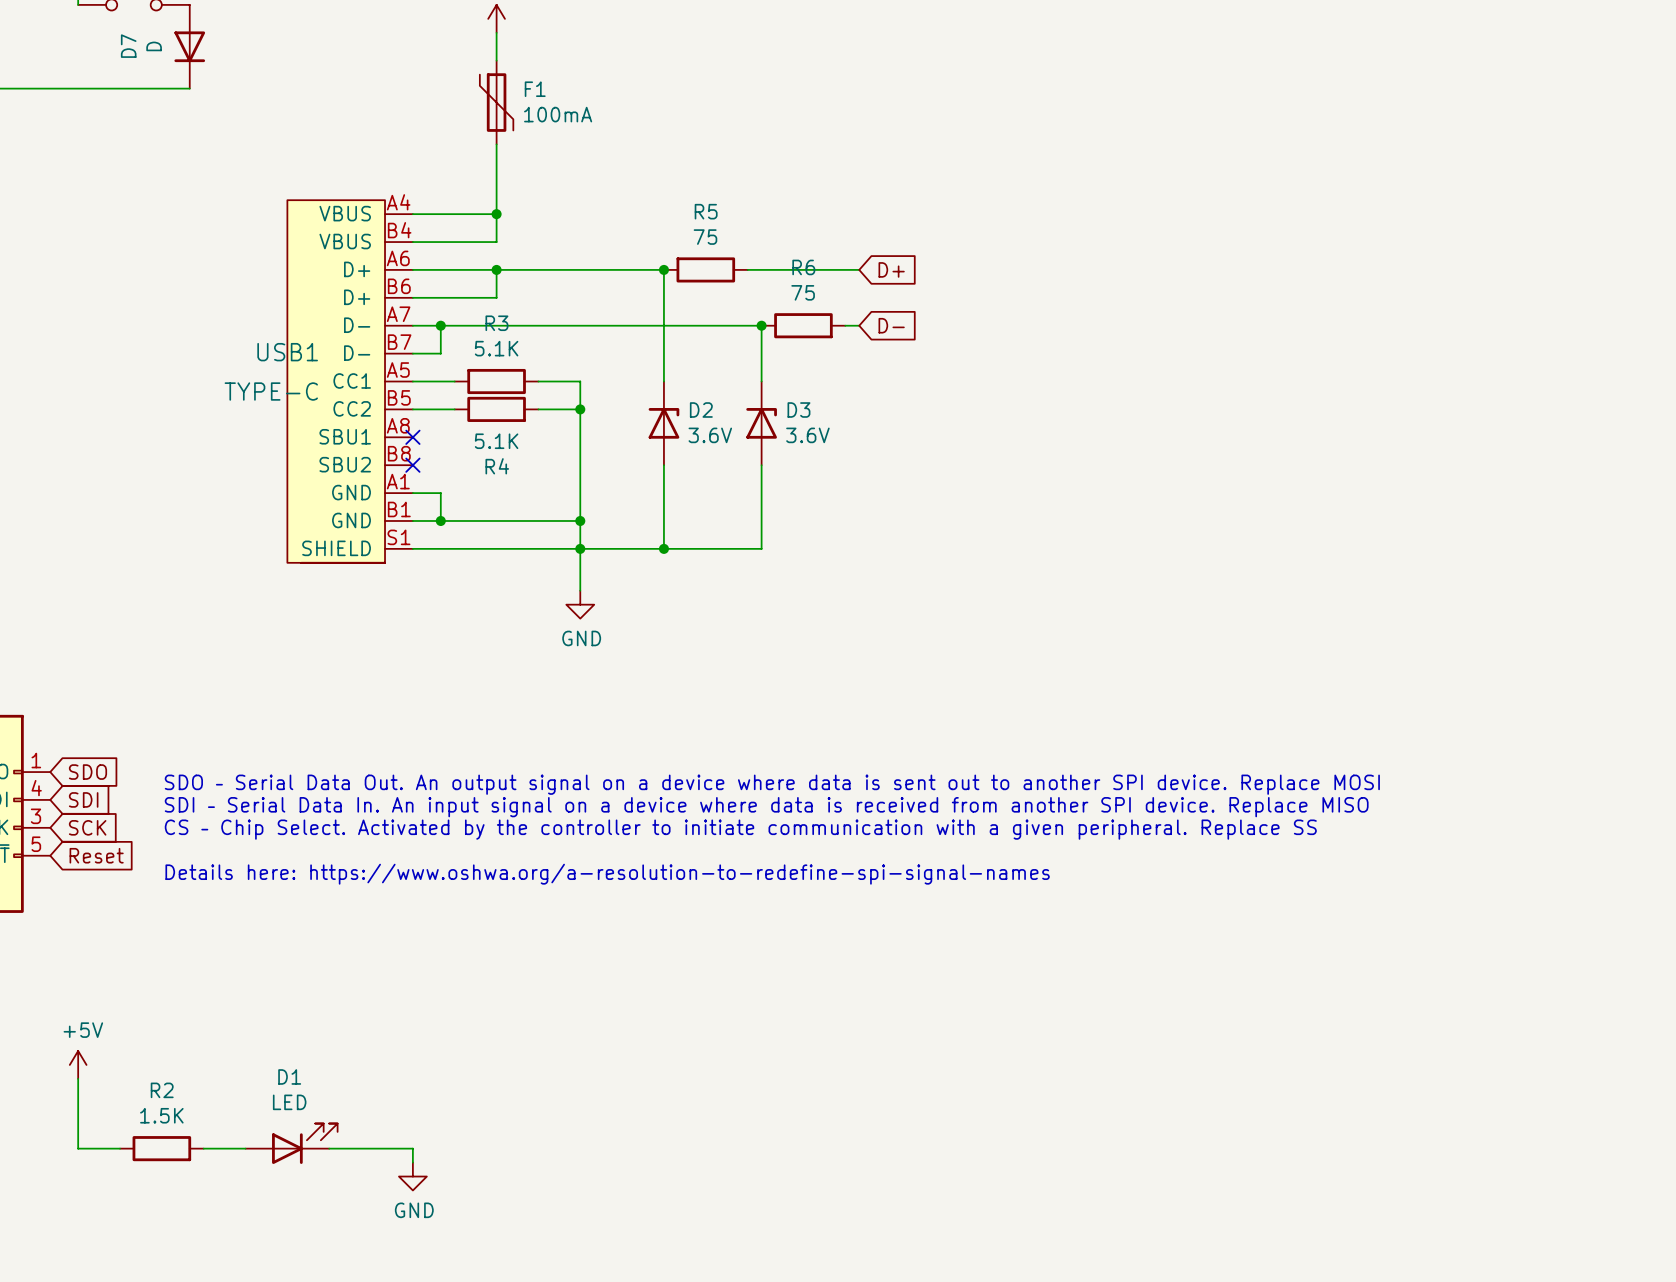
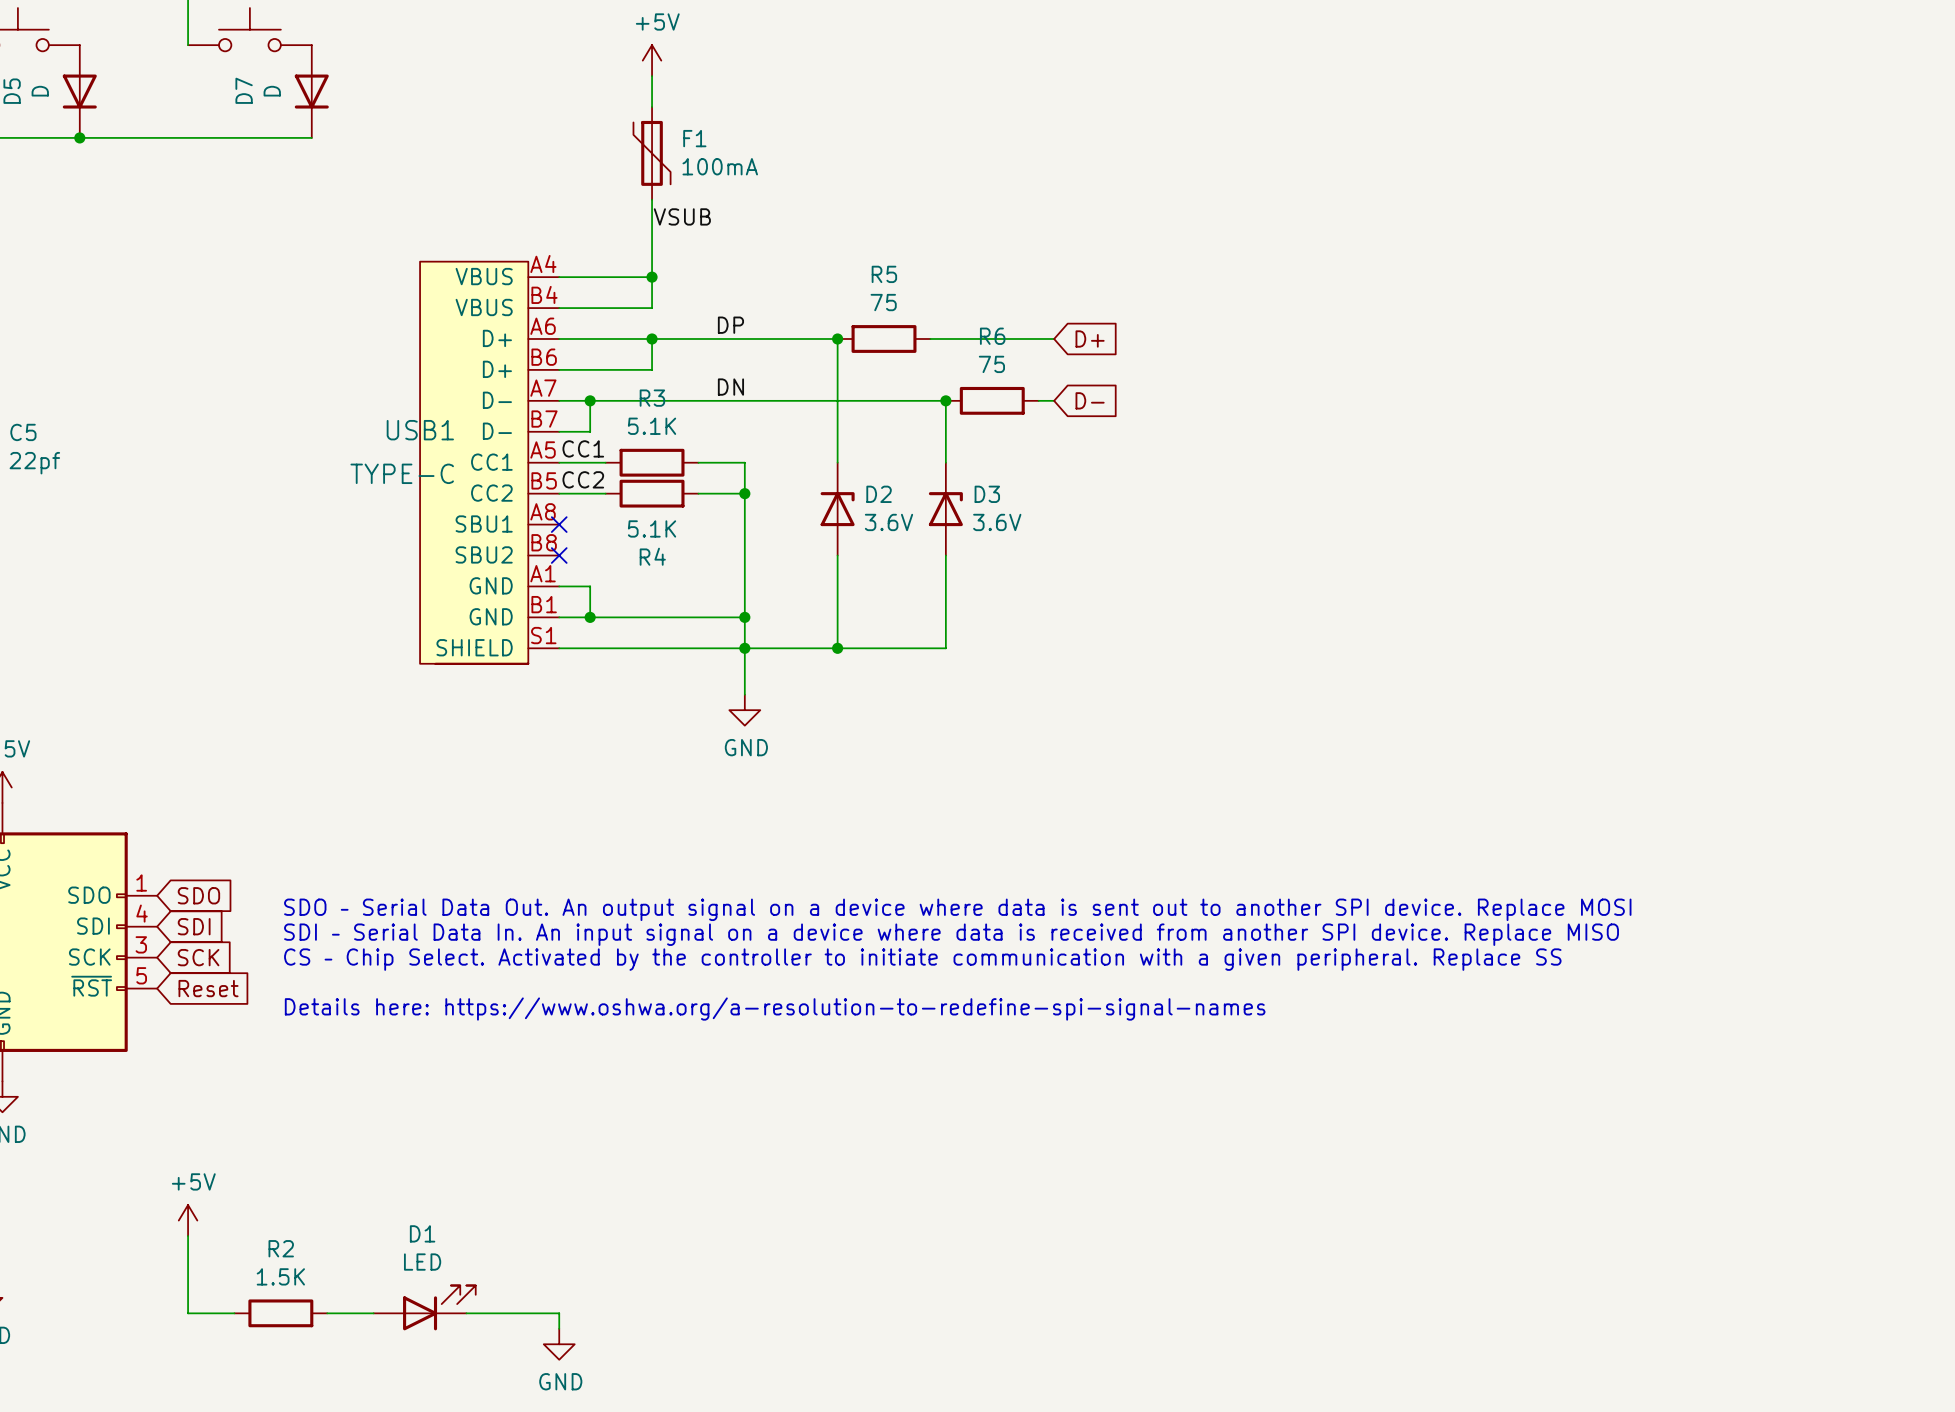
label: none -> VSUB (682, 216)
label: none -> DP (730, 325)
label: none -> DN (730, 387)
label: none -> CC1 (583, 448)
label: none -> CC2 (583, 479)

